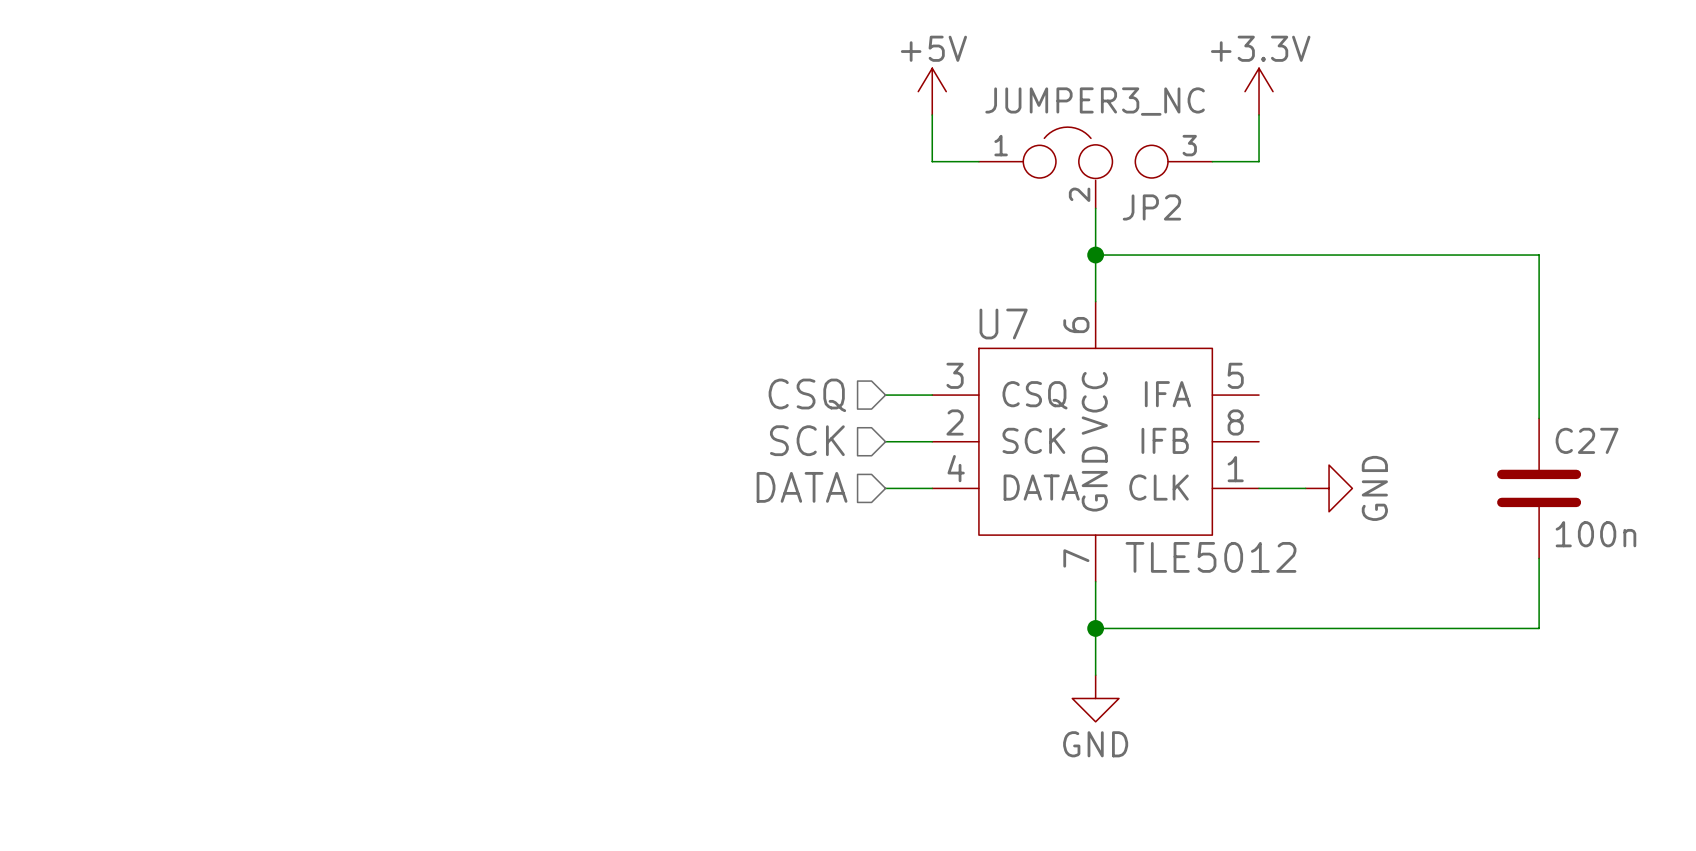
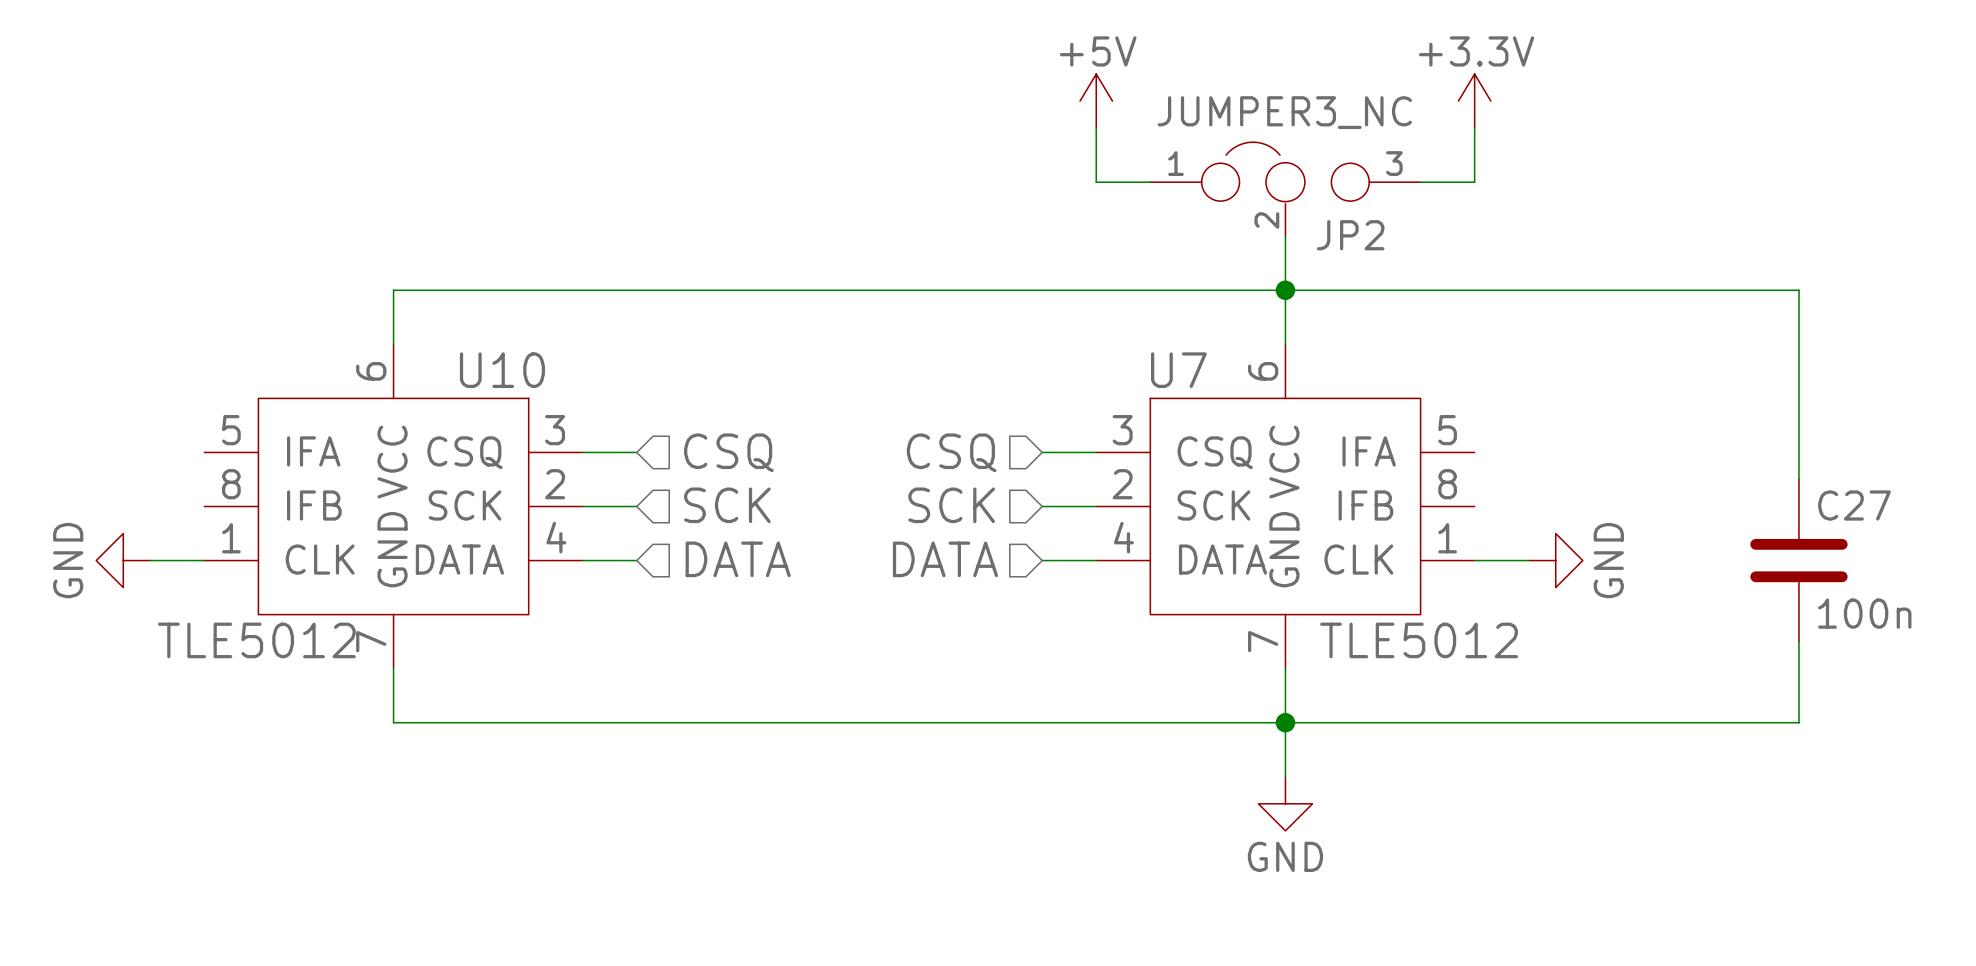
wire: none -> (1285, 290) (393, 290) (393, 344)
wire: none -> (582, 452) (636, 452)
hierarchical label: none -> CSQ (728, 452)
hierarchical label: none -> SCK (727, 505)
U10: none -> TLE5012 (393, 506)
wire: none -> (582, 506) (636, 506)
hierarchical label: none -> DATA (738, 559)
power symbol: none -> GND (123, 560)
wire: none -> (150, 560) (204, 560)
wire: none -> (582, 560) (636, 560)
wire: none -> (393, 668) (393, 722) (1285, 722)

